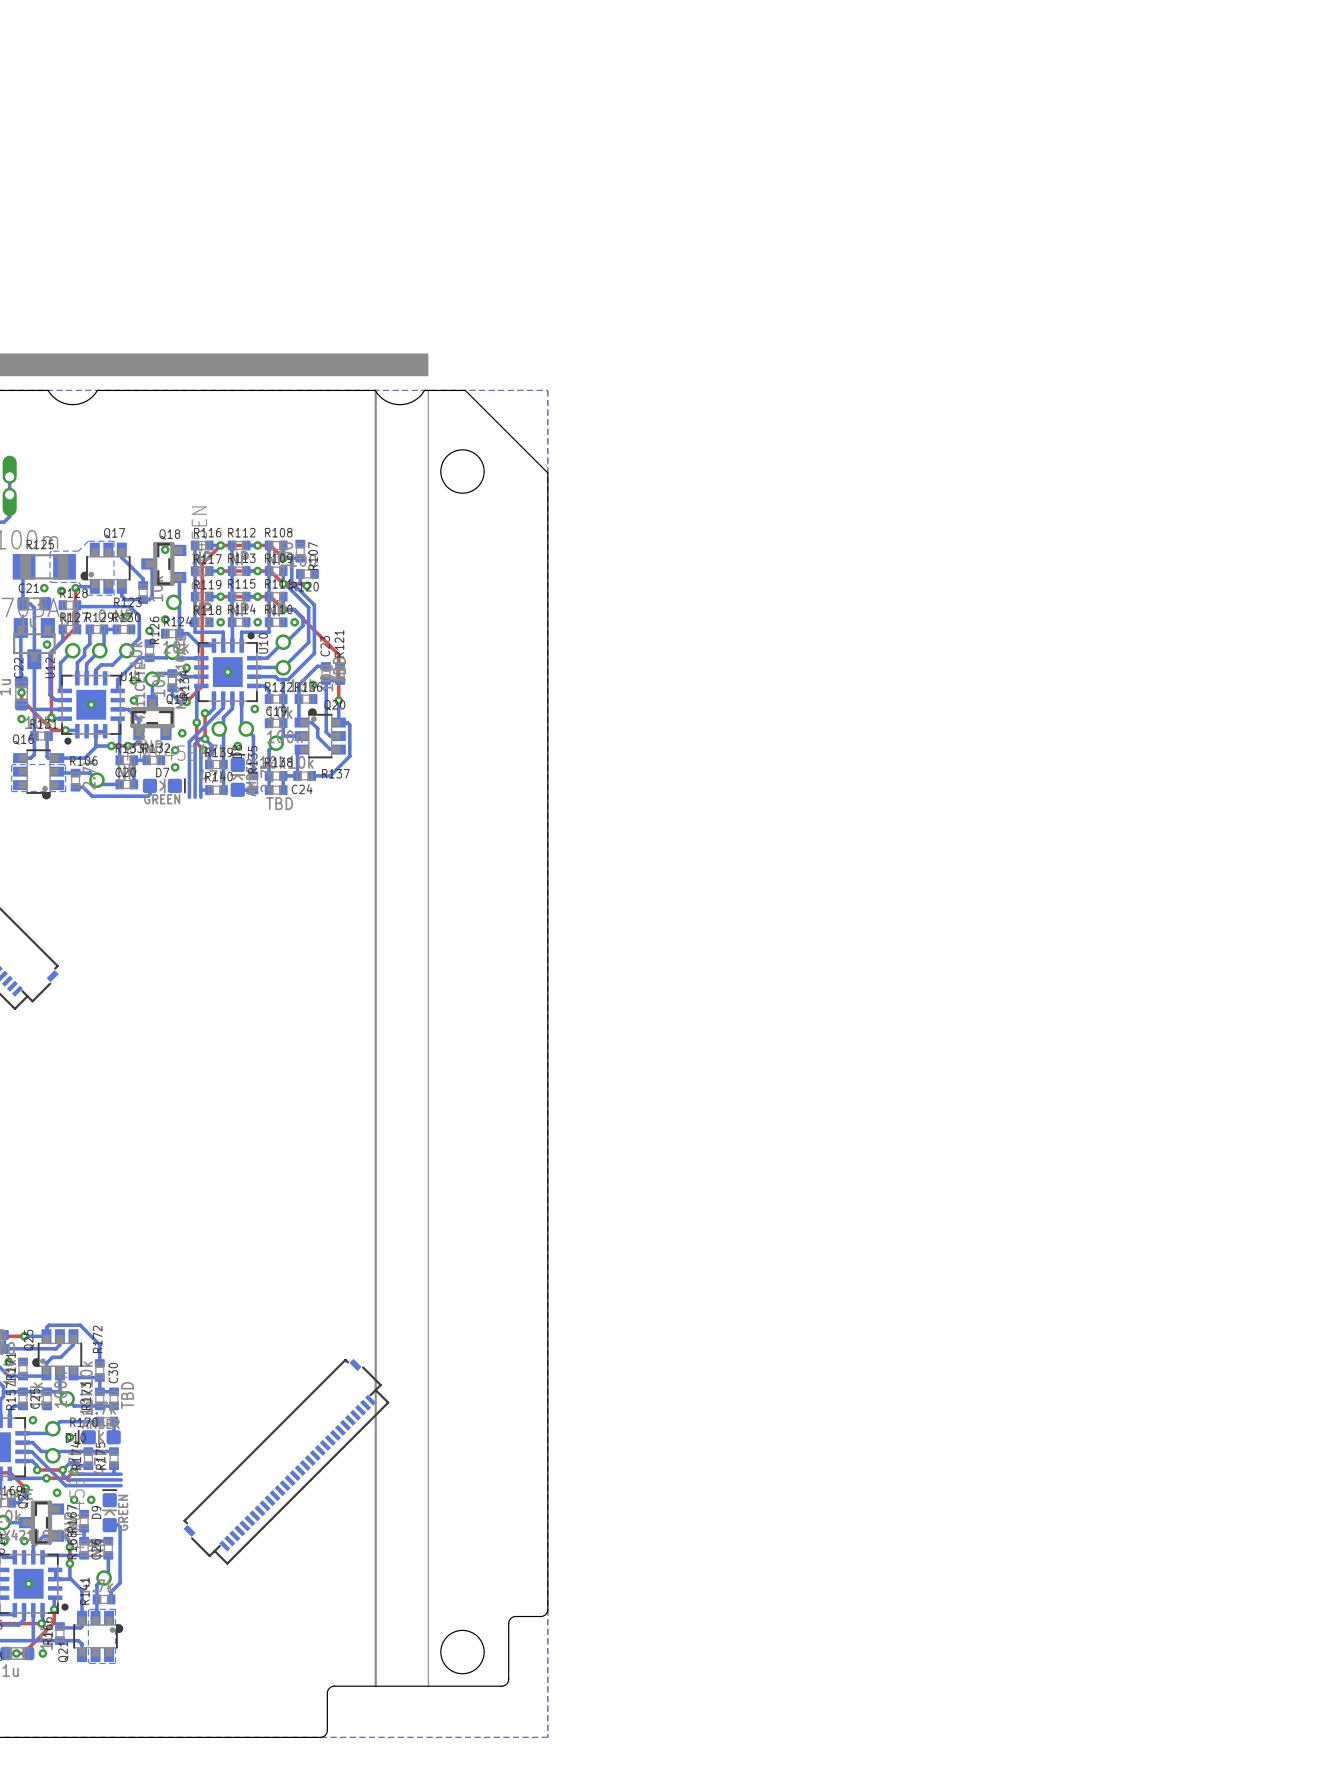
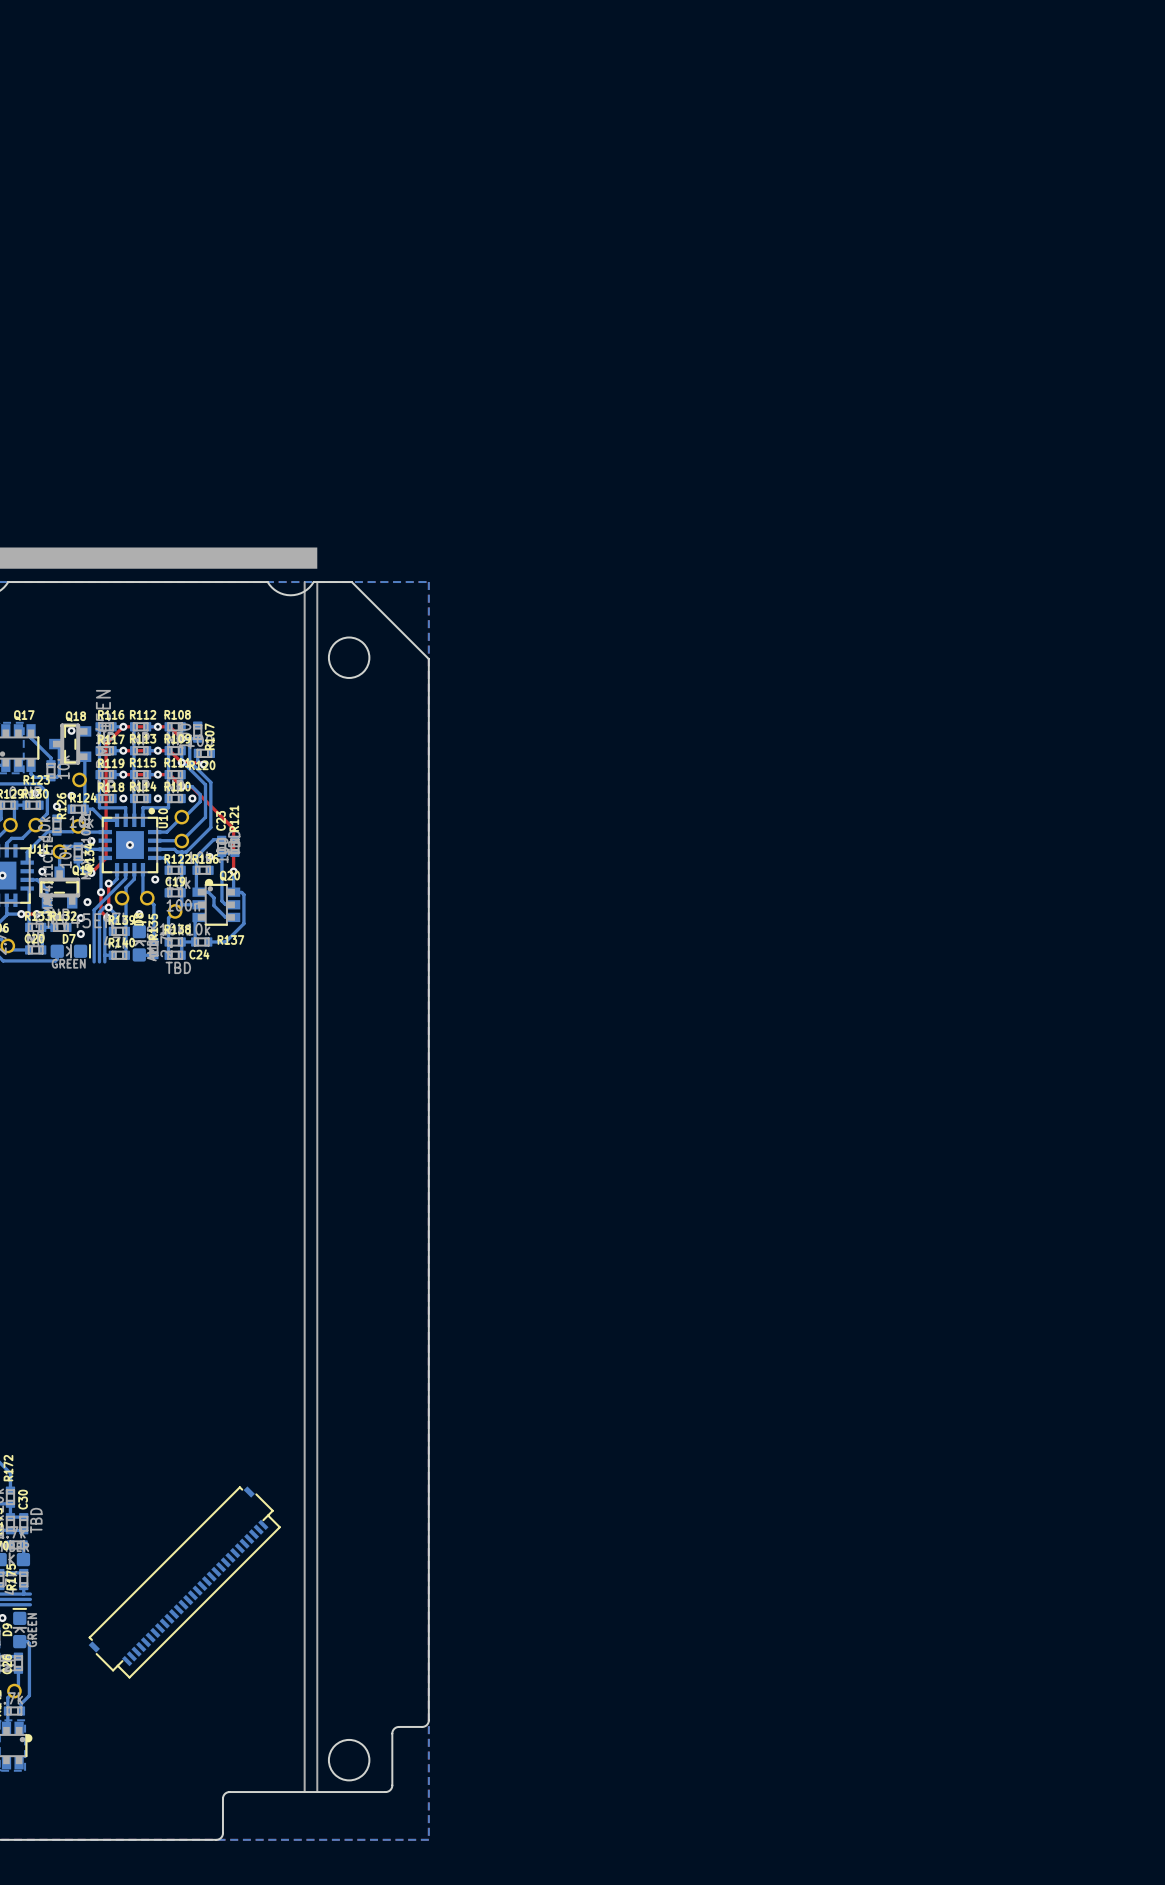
line: (375, 390) (375, 1686) -> (304, 582) (304, 1792)

